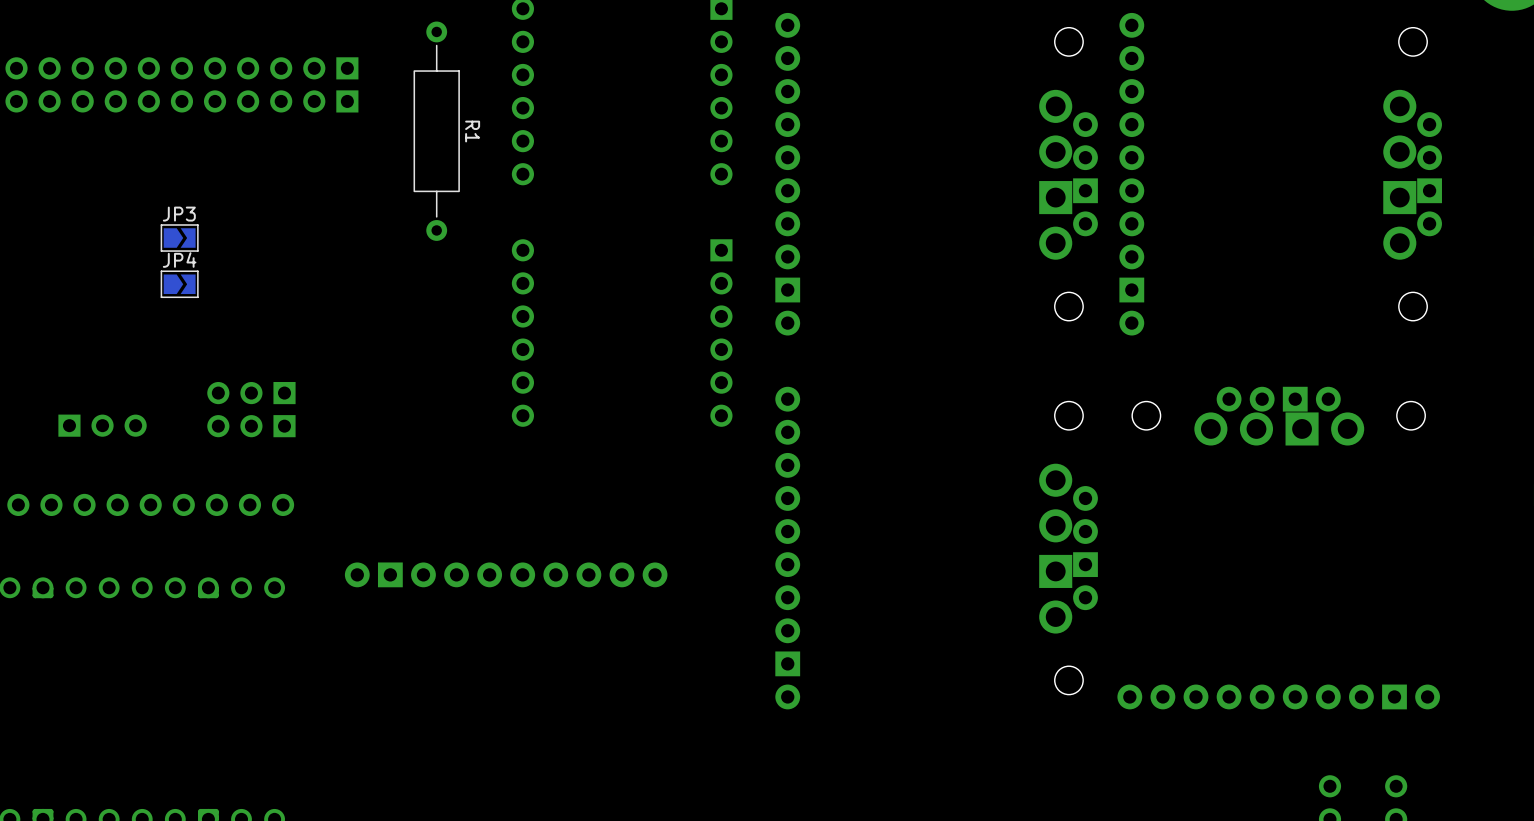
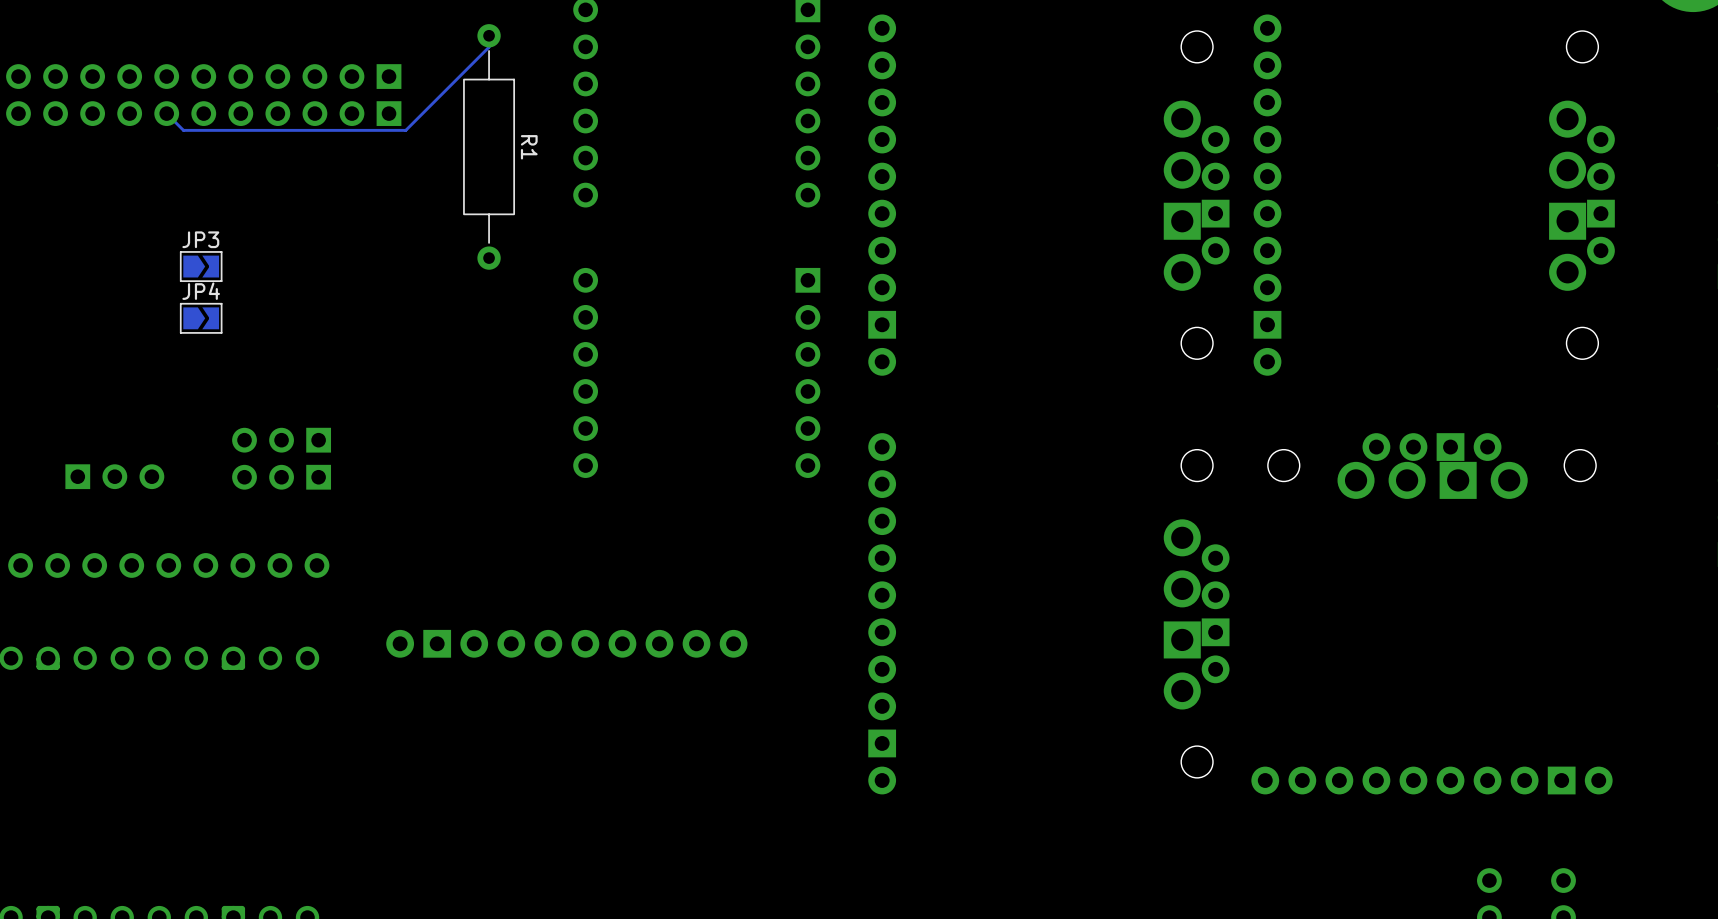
track: none -> (489, 35) (489, 47) (405, 130) (183, 130) (166, 113)

